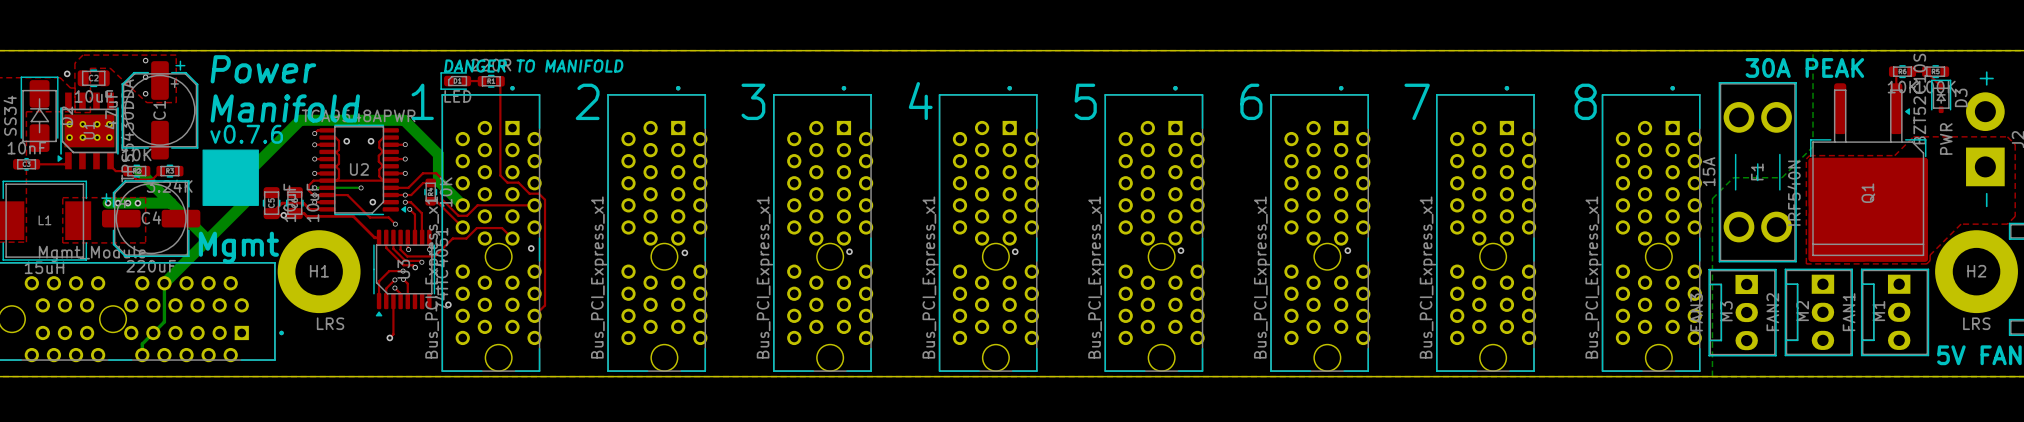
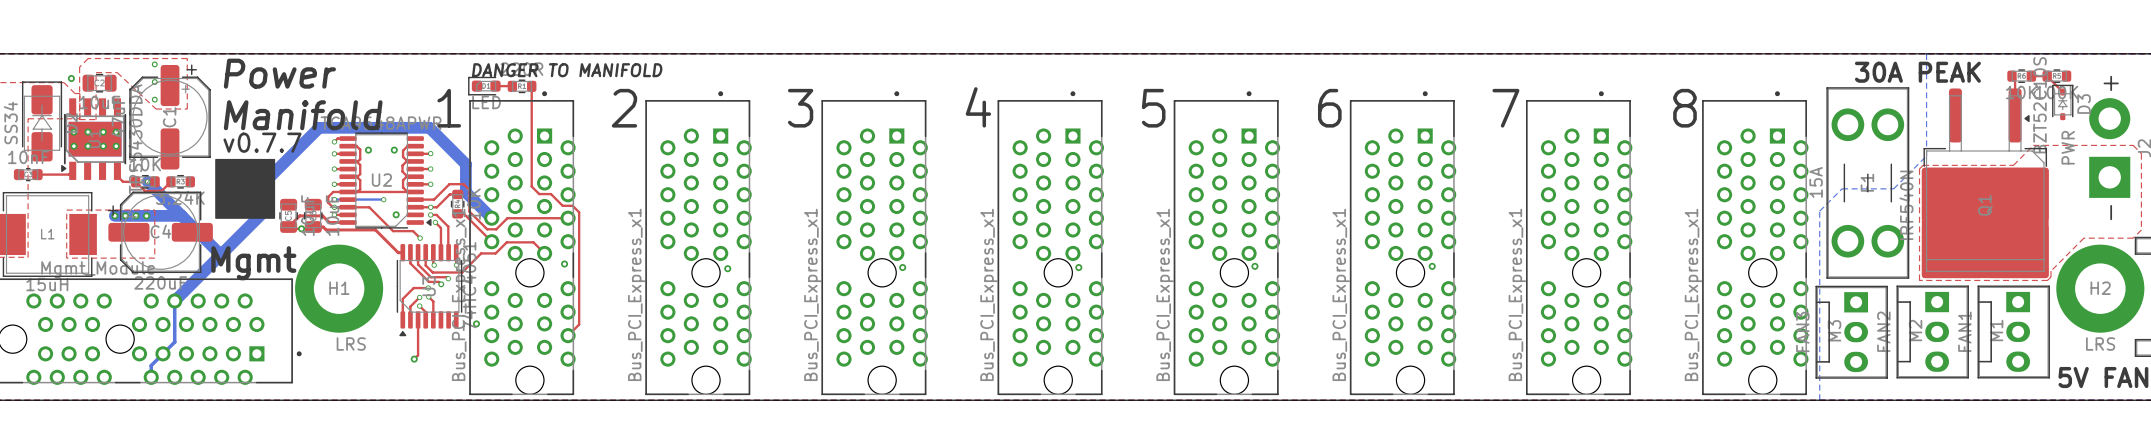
text: v0.7.6 (246, 134) -> v0.7.7 (262, 142)

